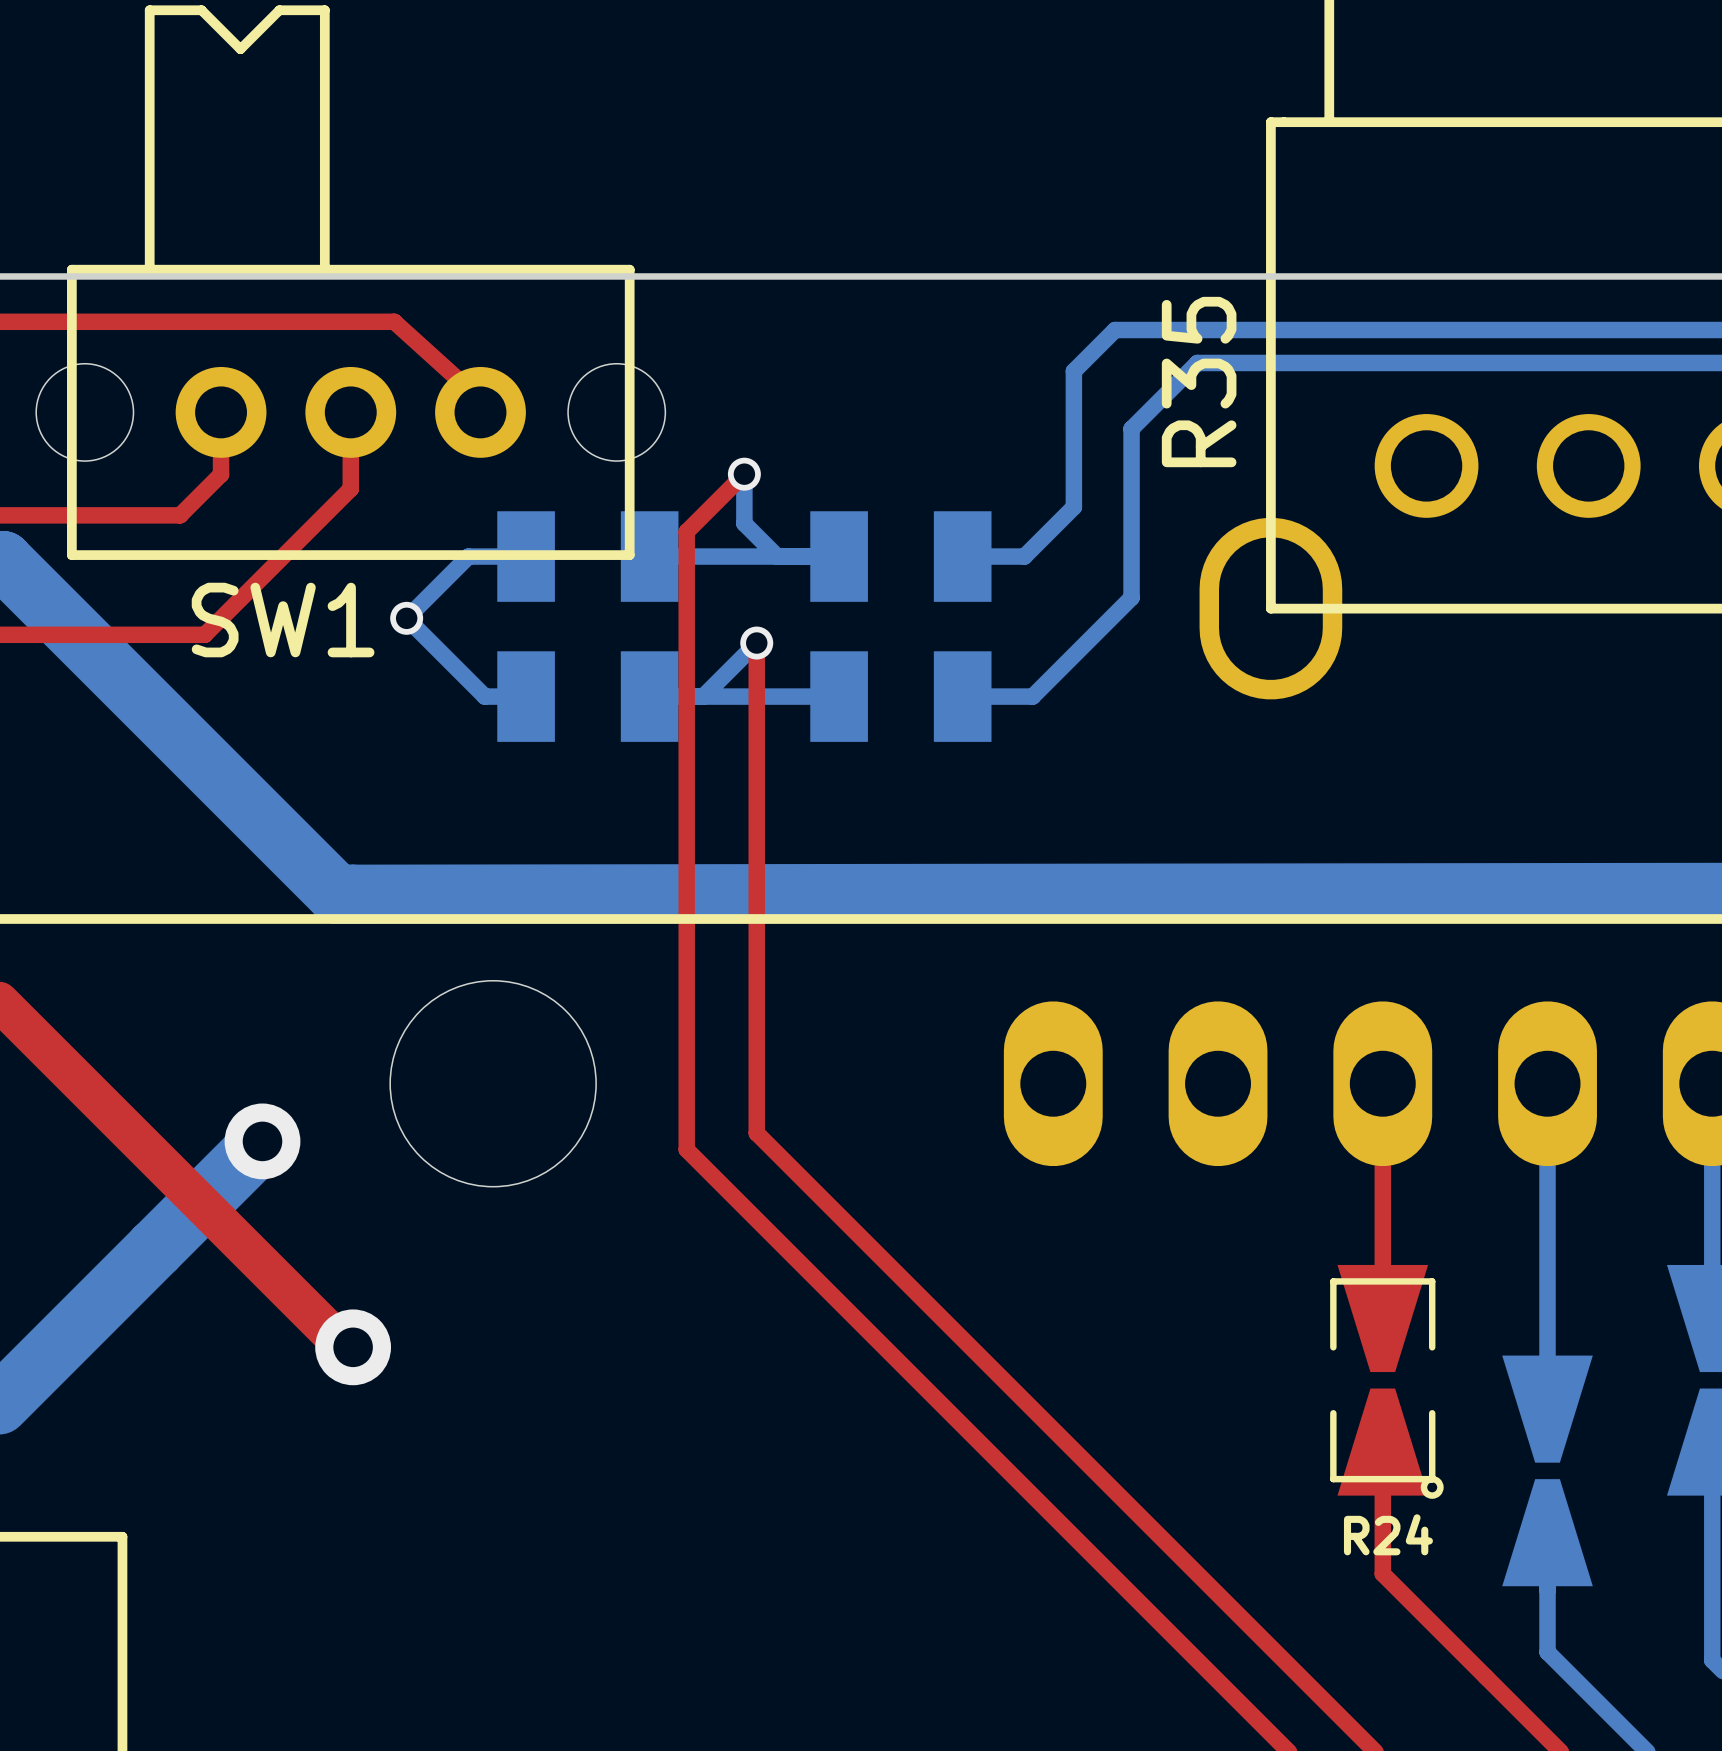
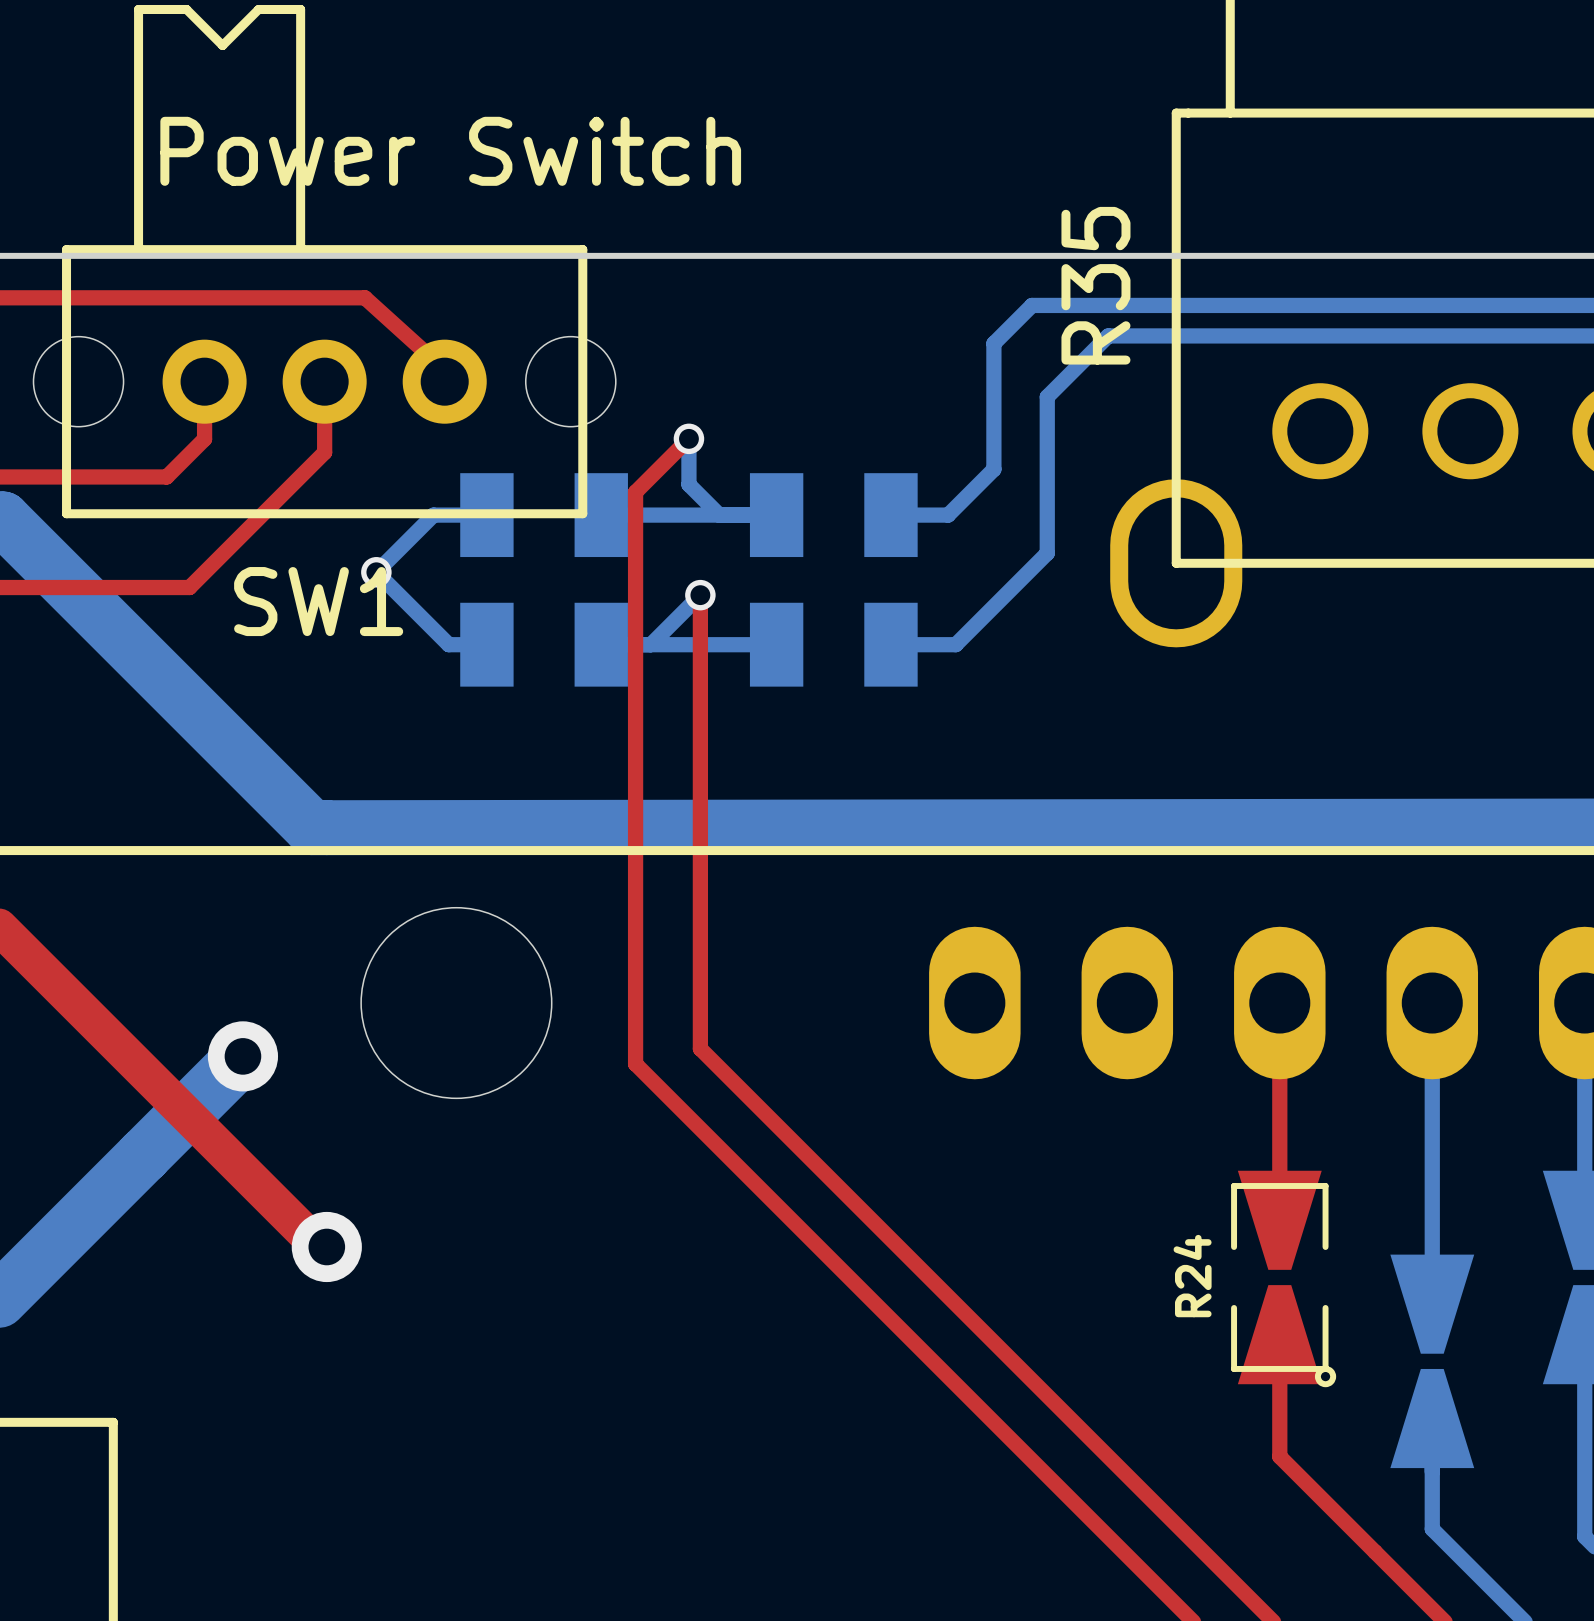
SW1 value: none -> Power Switch (450, 151)
R35 name position: R35 (1199, 382) -> R35 (1095, 285)
SW1 name position: SW1 (283, 620) -> SW1 (318, 601)
R24 name rotation: 0° (1388, 1534) -> 90° counterclockwise (1192, 1276)
R24 name position: R24 (1388, 1534) -> R24 (1192, 1276)

